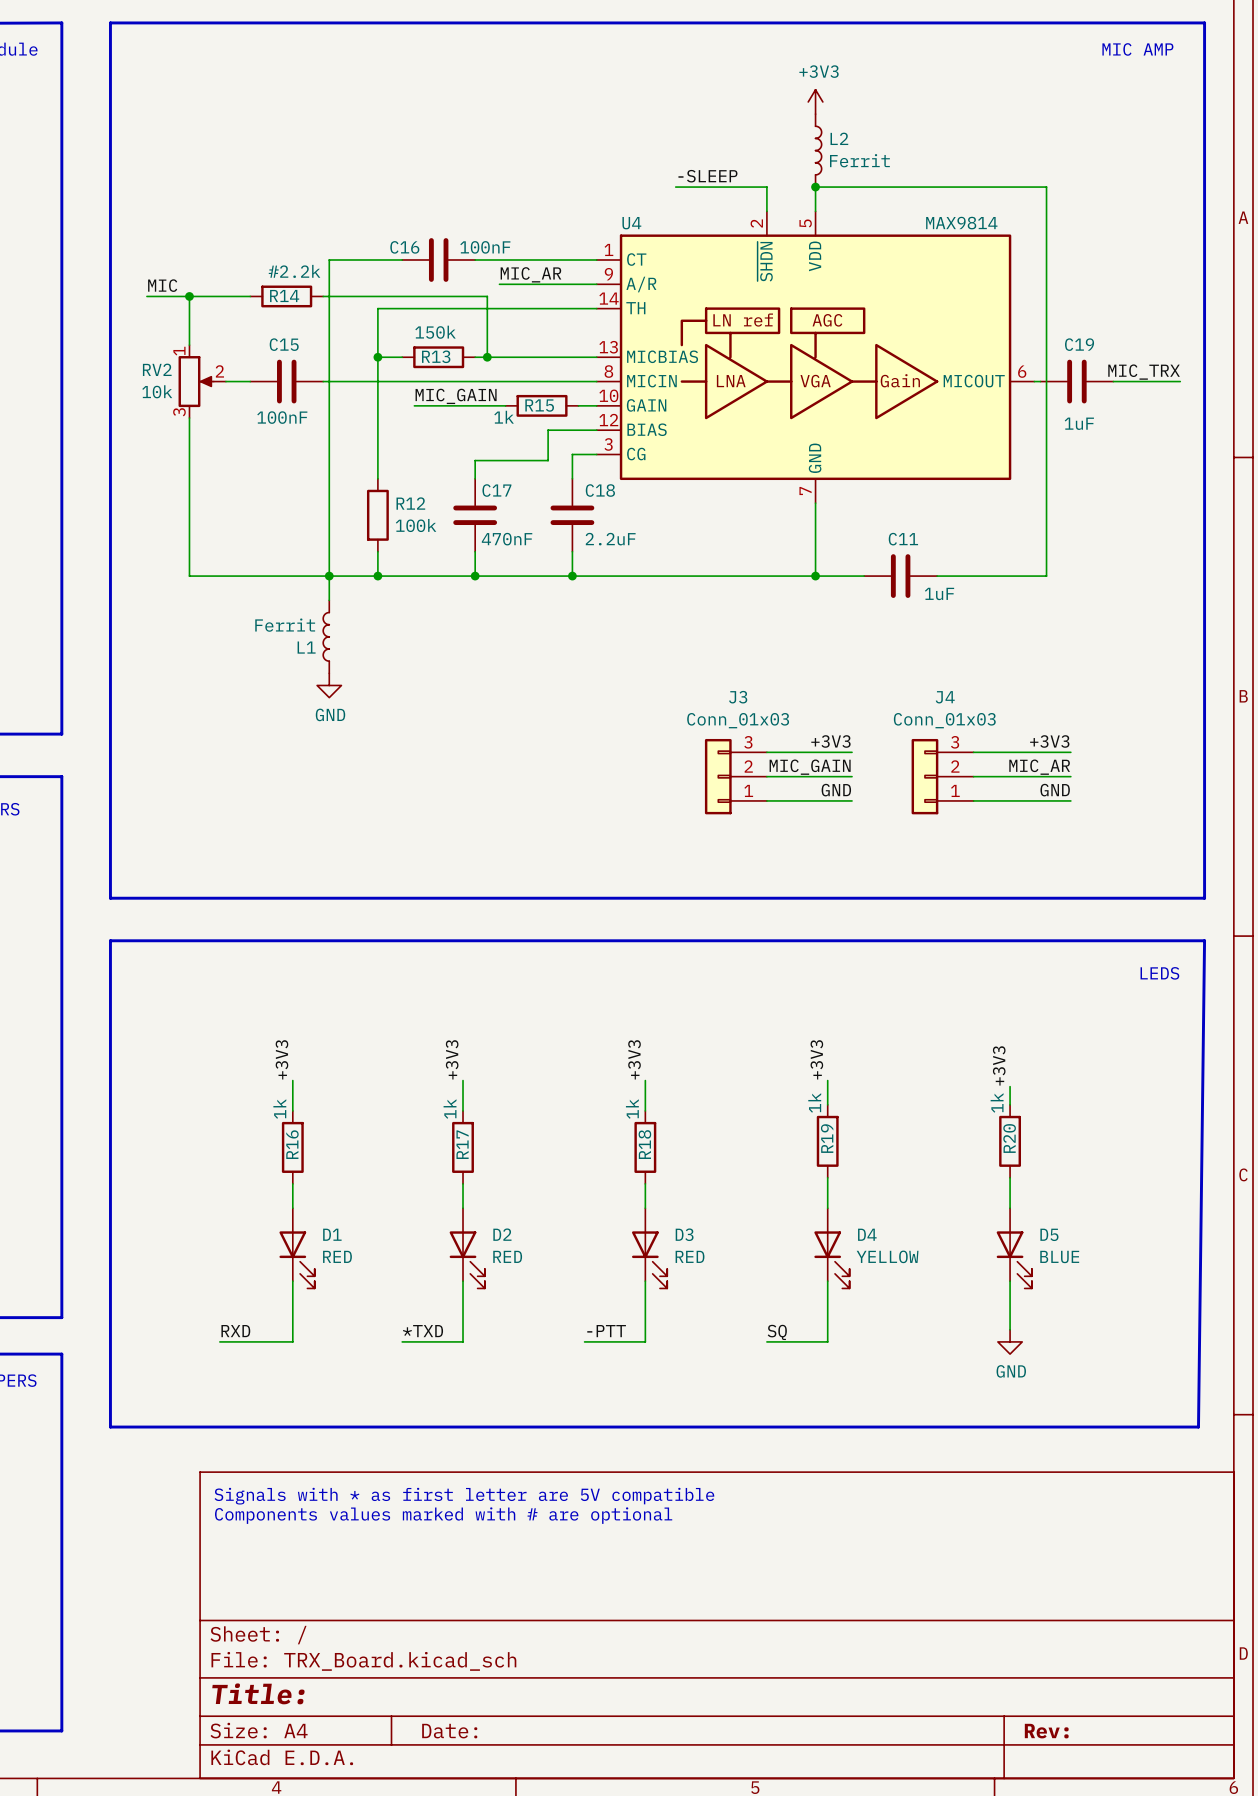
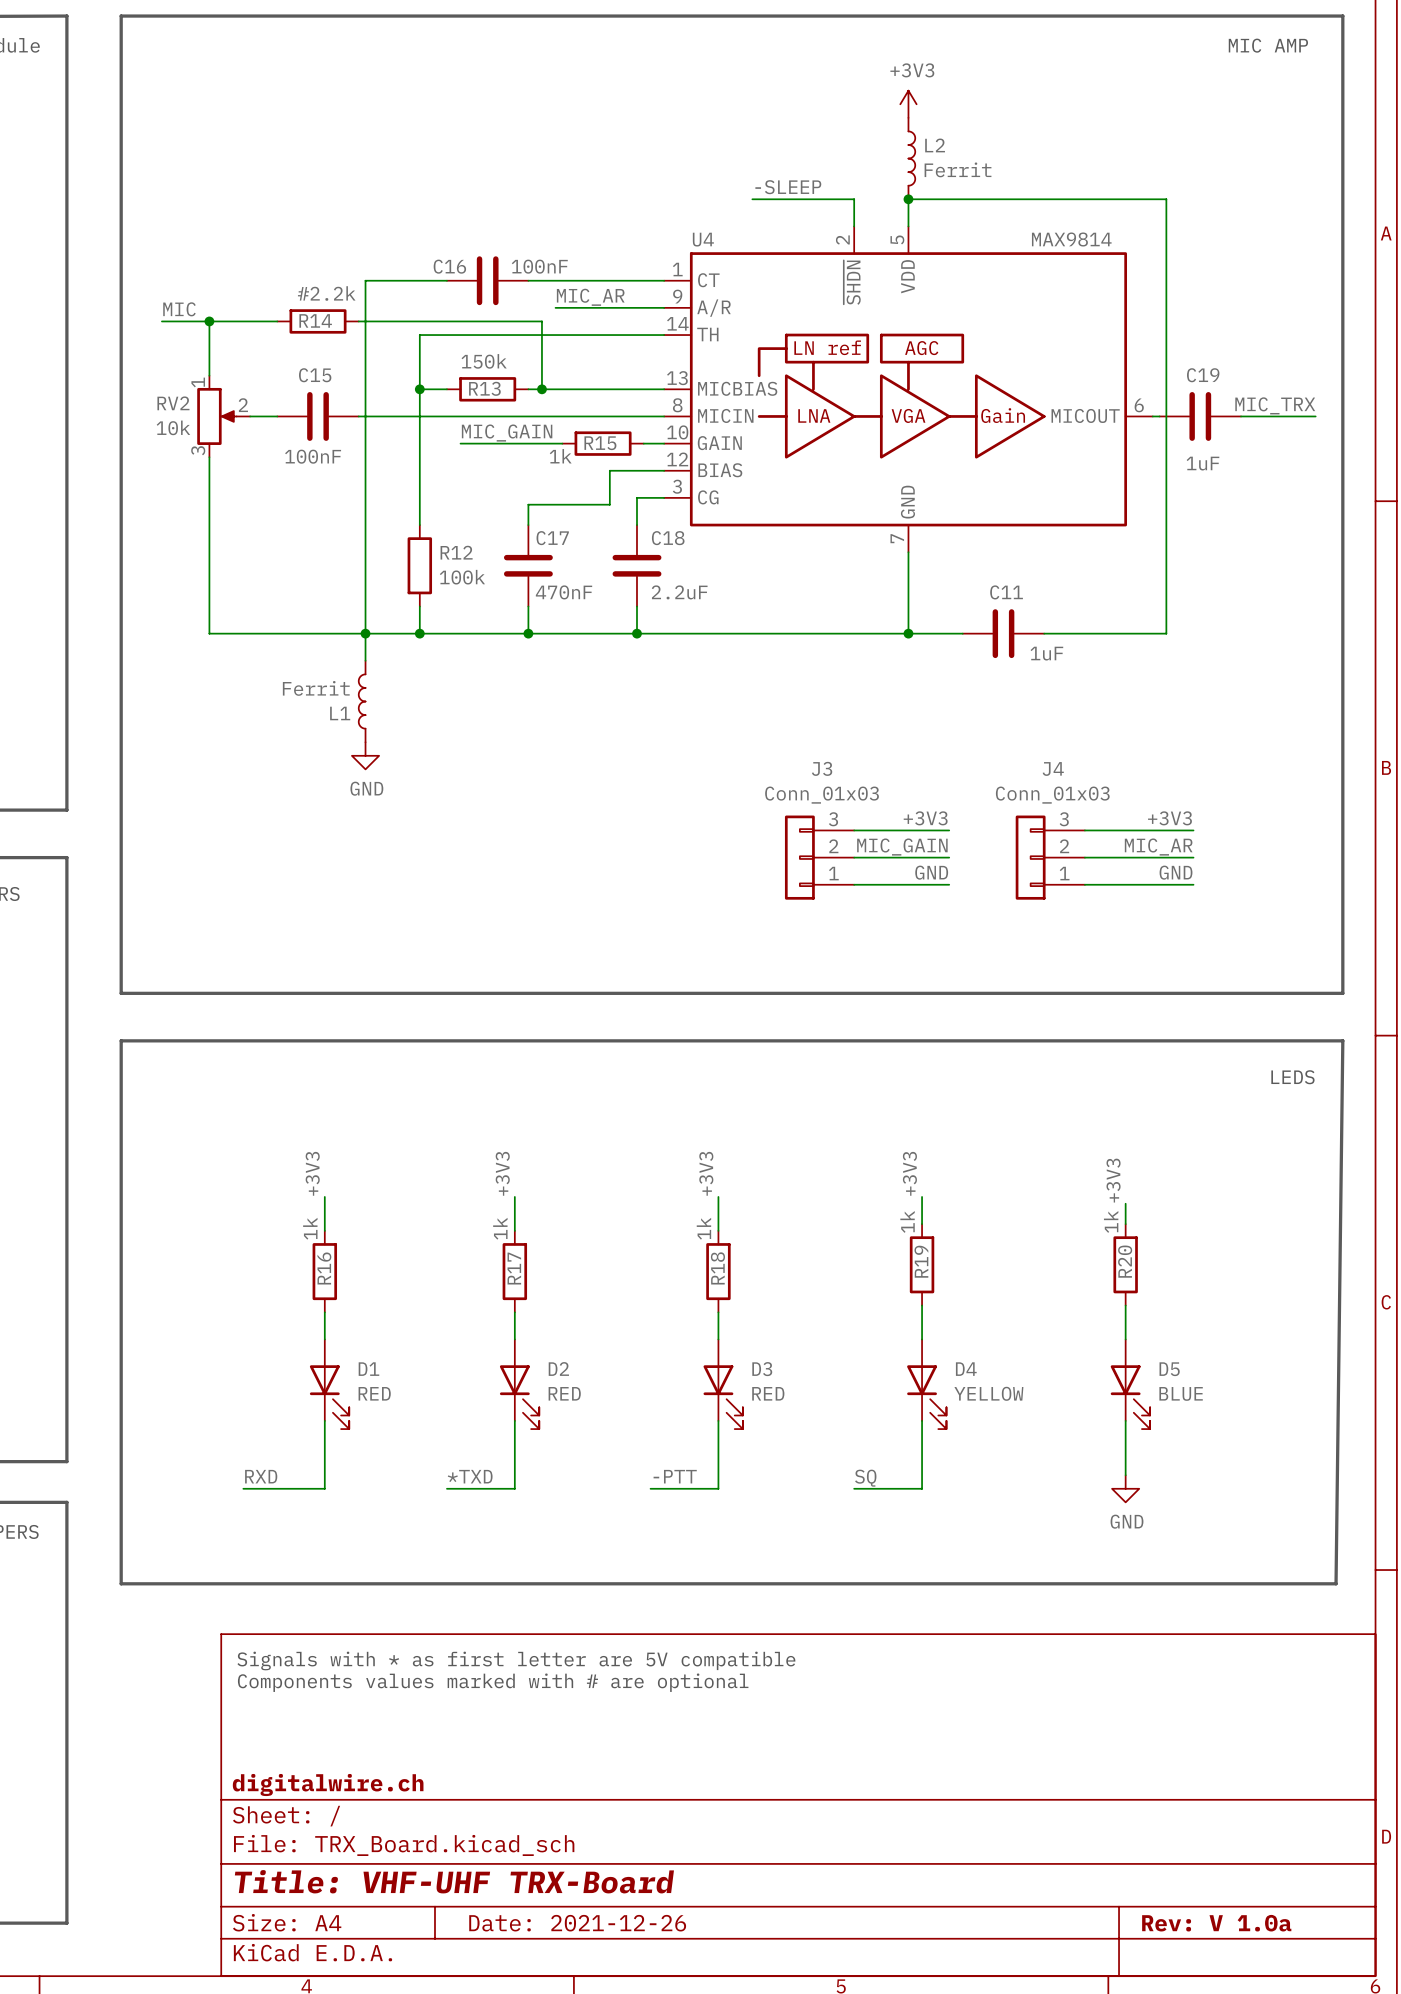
title block: none -> digitalwire.ch (328, 1785)
title block: Title: (258, 1693) -> Title: VHF-UHF TRX-Board (454, 1881)
title block: Date: (449, 1731) -> Date: 2021-12-26 (577, 1923)
title block: Rev: (1046, 1731) -> Rev: V 1.0a (1216, 1923)

